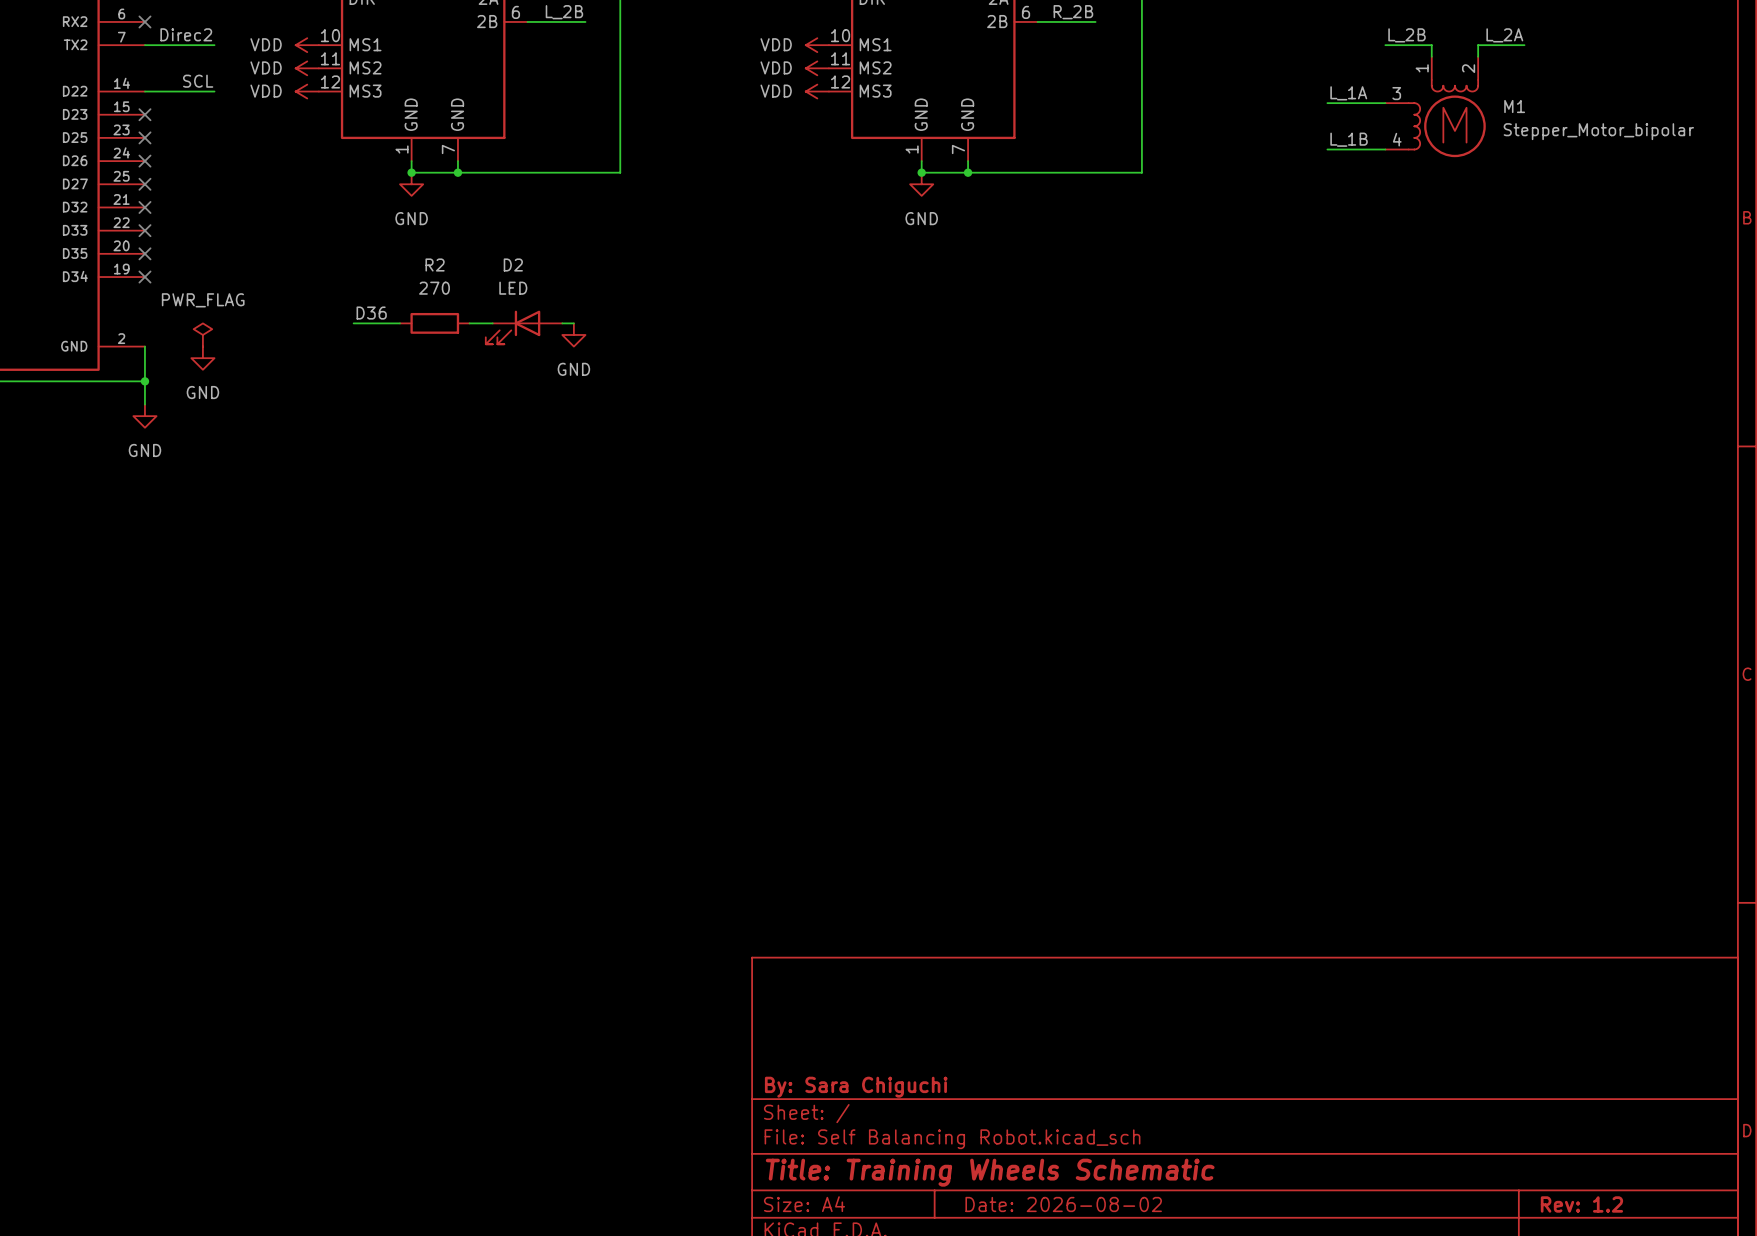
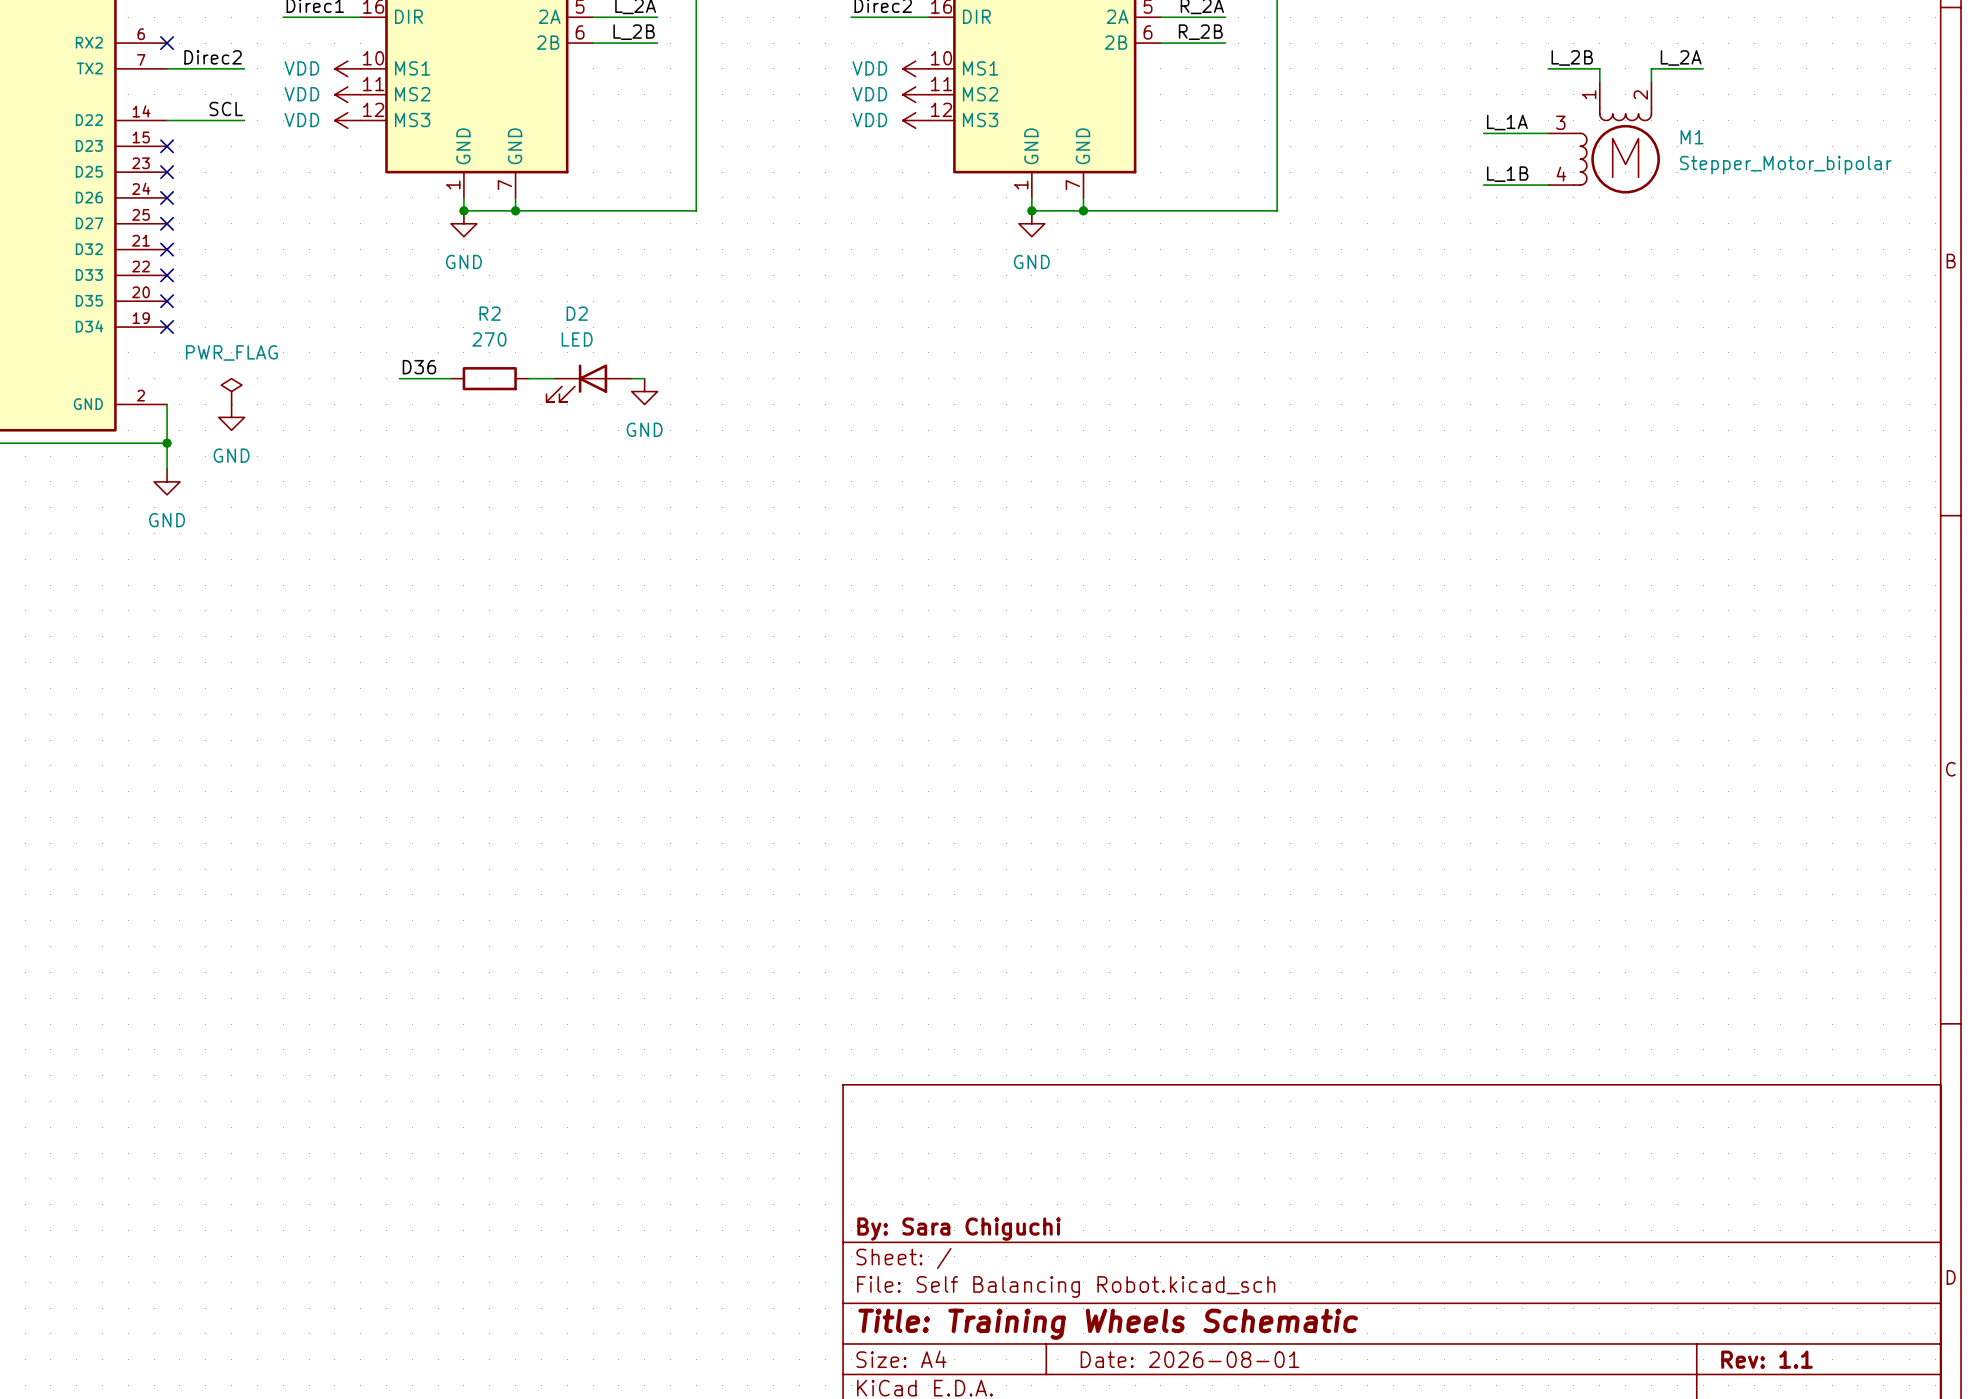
title block: Date: 2026-08-02 (1063, 1204) -> Date: 2026-08-01 (1189, 1359)
title block: Rev: 1.2 (1581, 1204) -> Rev: 1.1 (1767, 1359)

